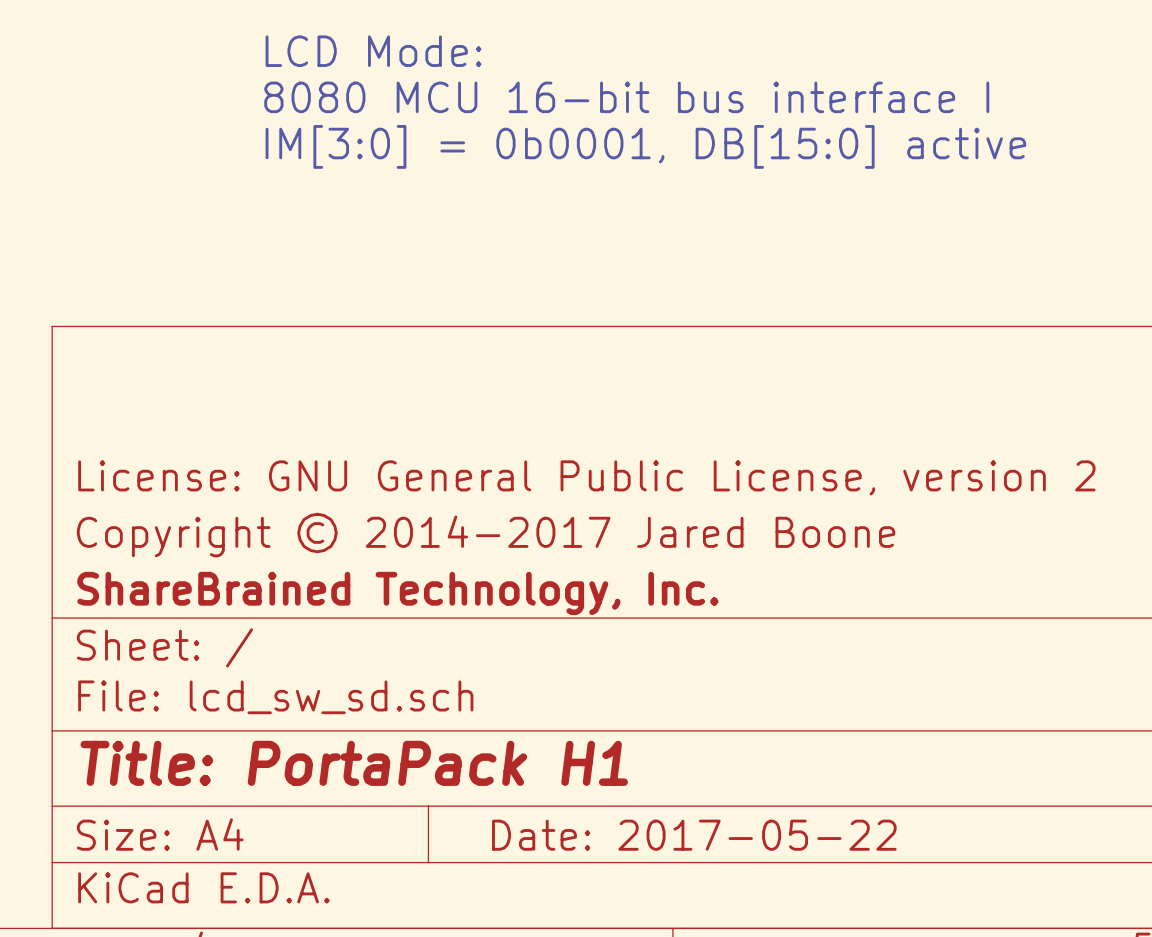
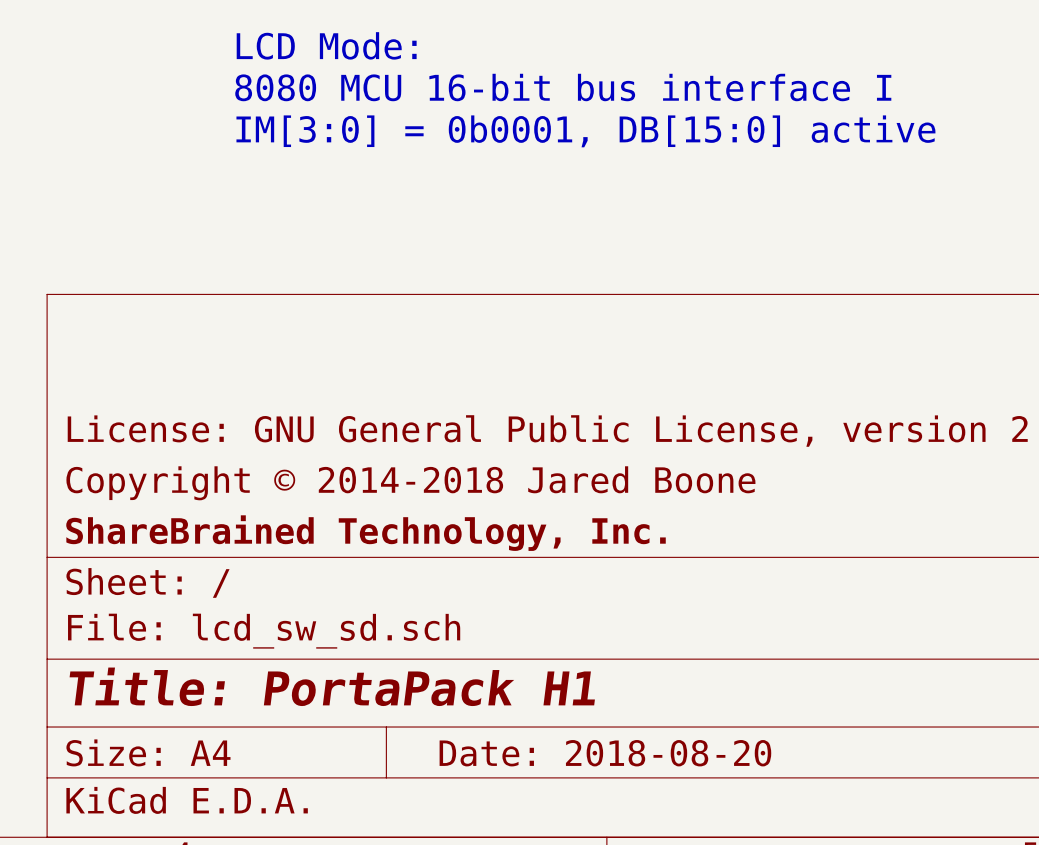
title block: Copyright © 2014-2017 Jared Boone (486, 535) -> Copyright © 2014-2018 Jared Boone (410, 483)
title block: Date: 2017-05-22 (694, 835) -> Date: 2018-08-20 (605, 753)

